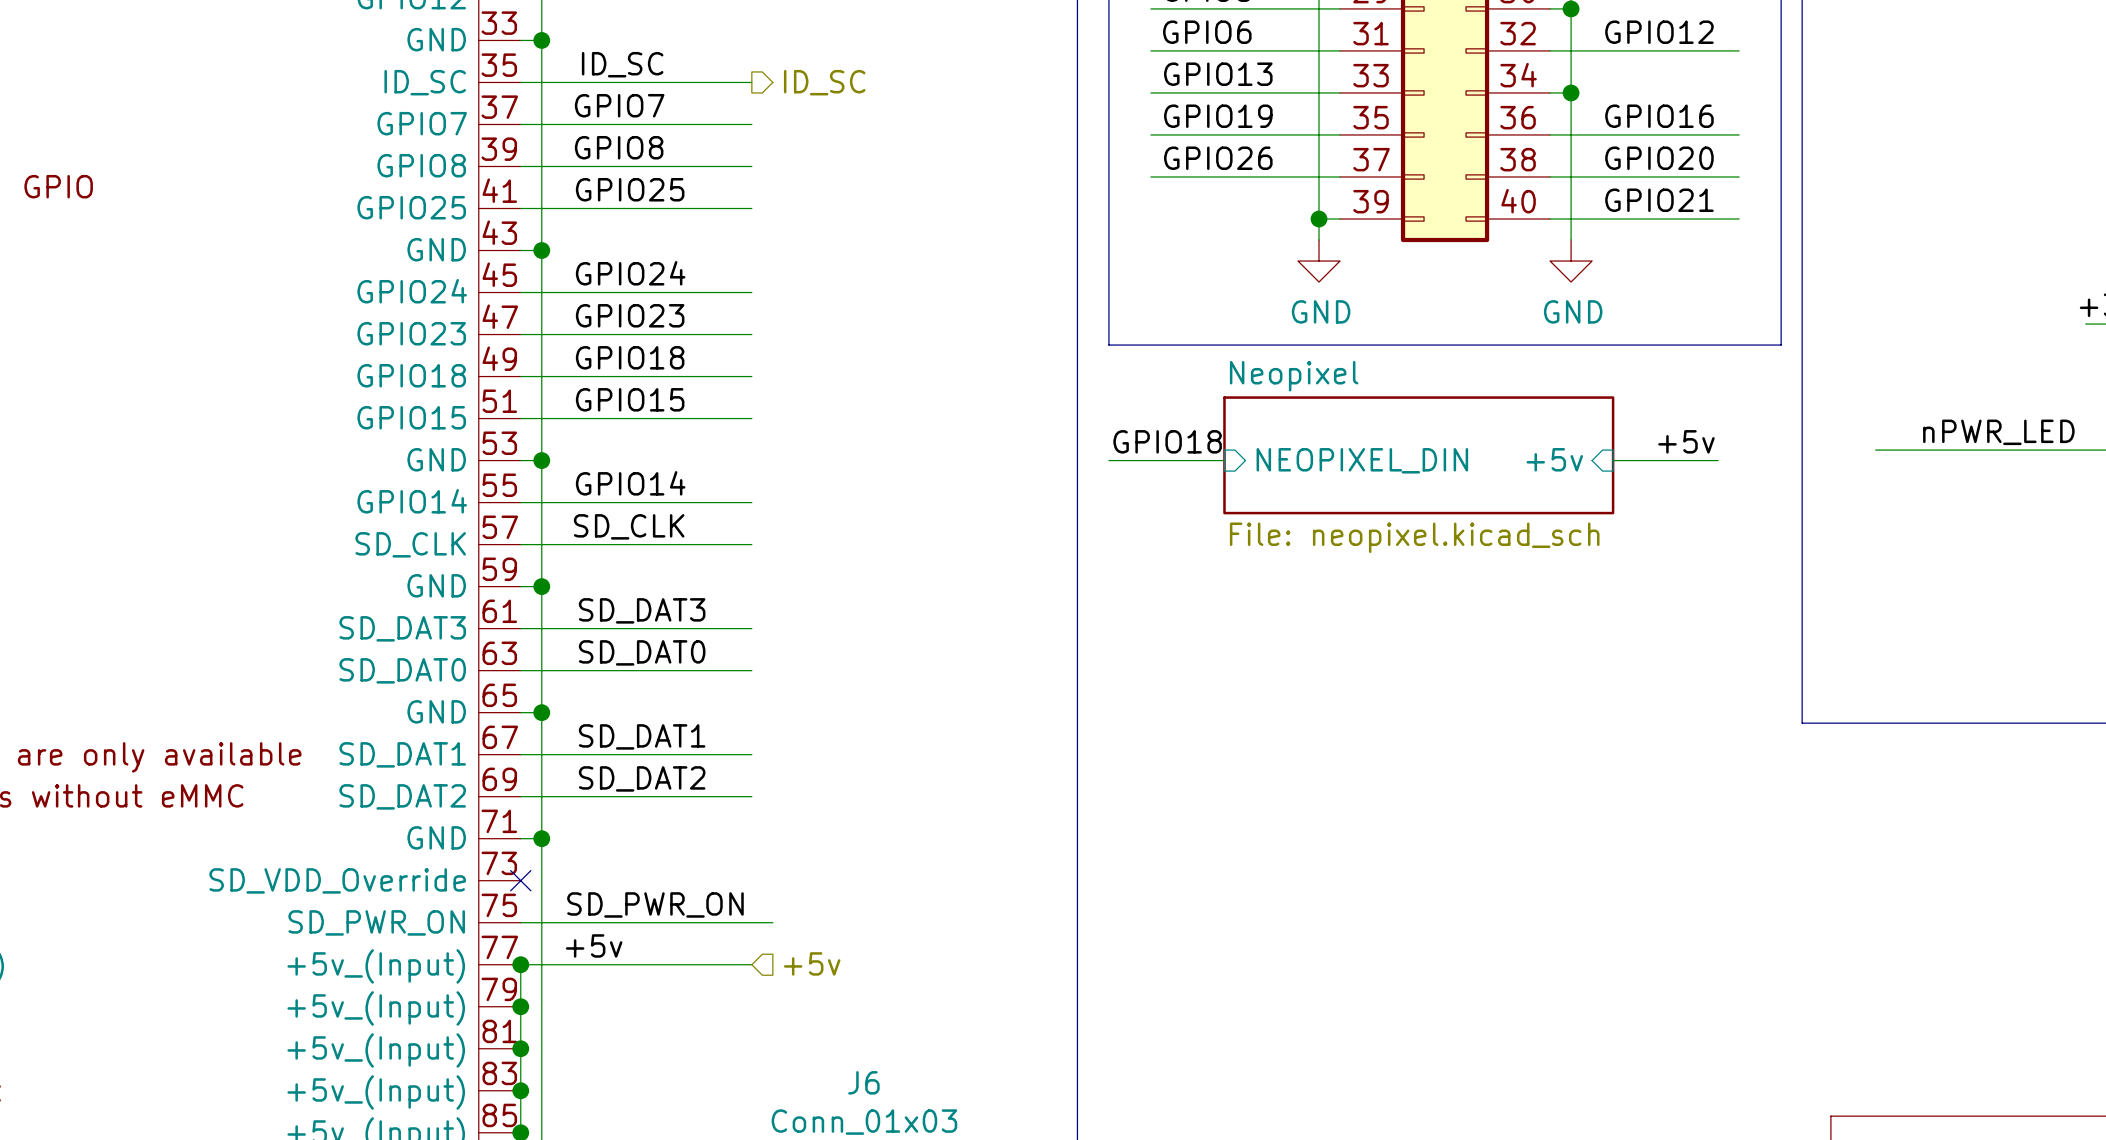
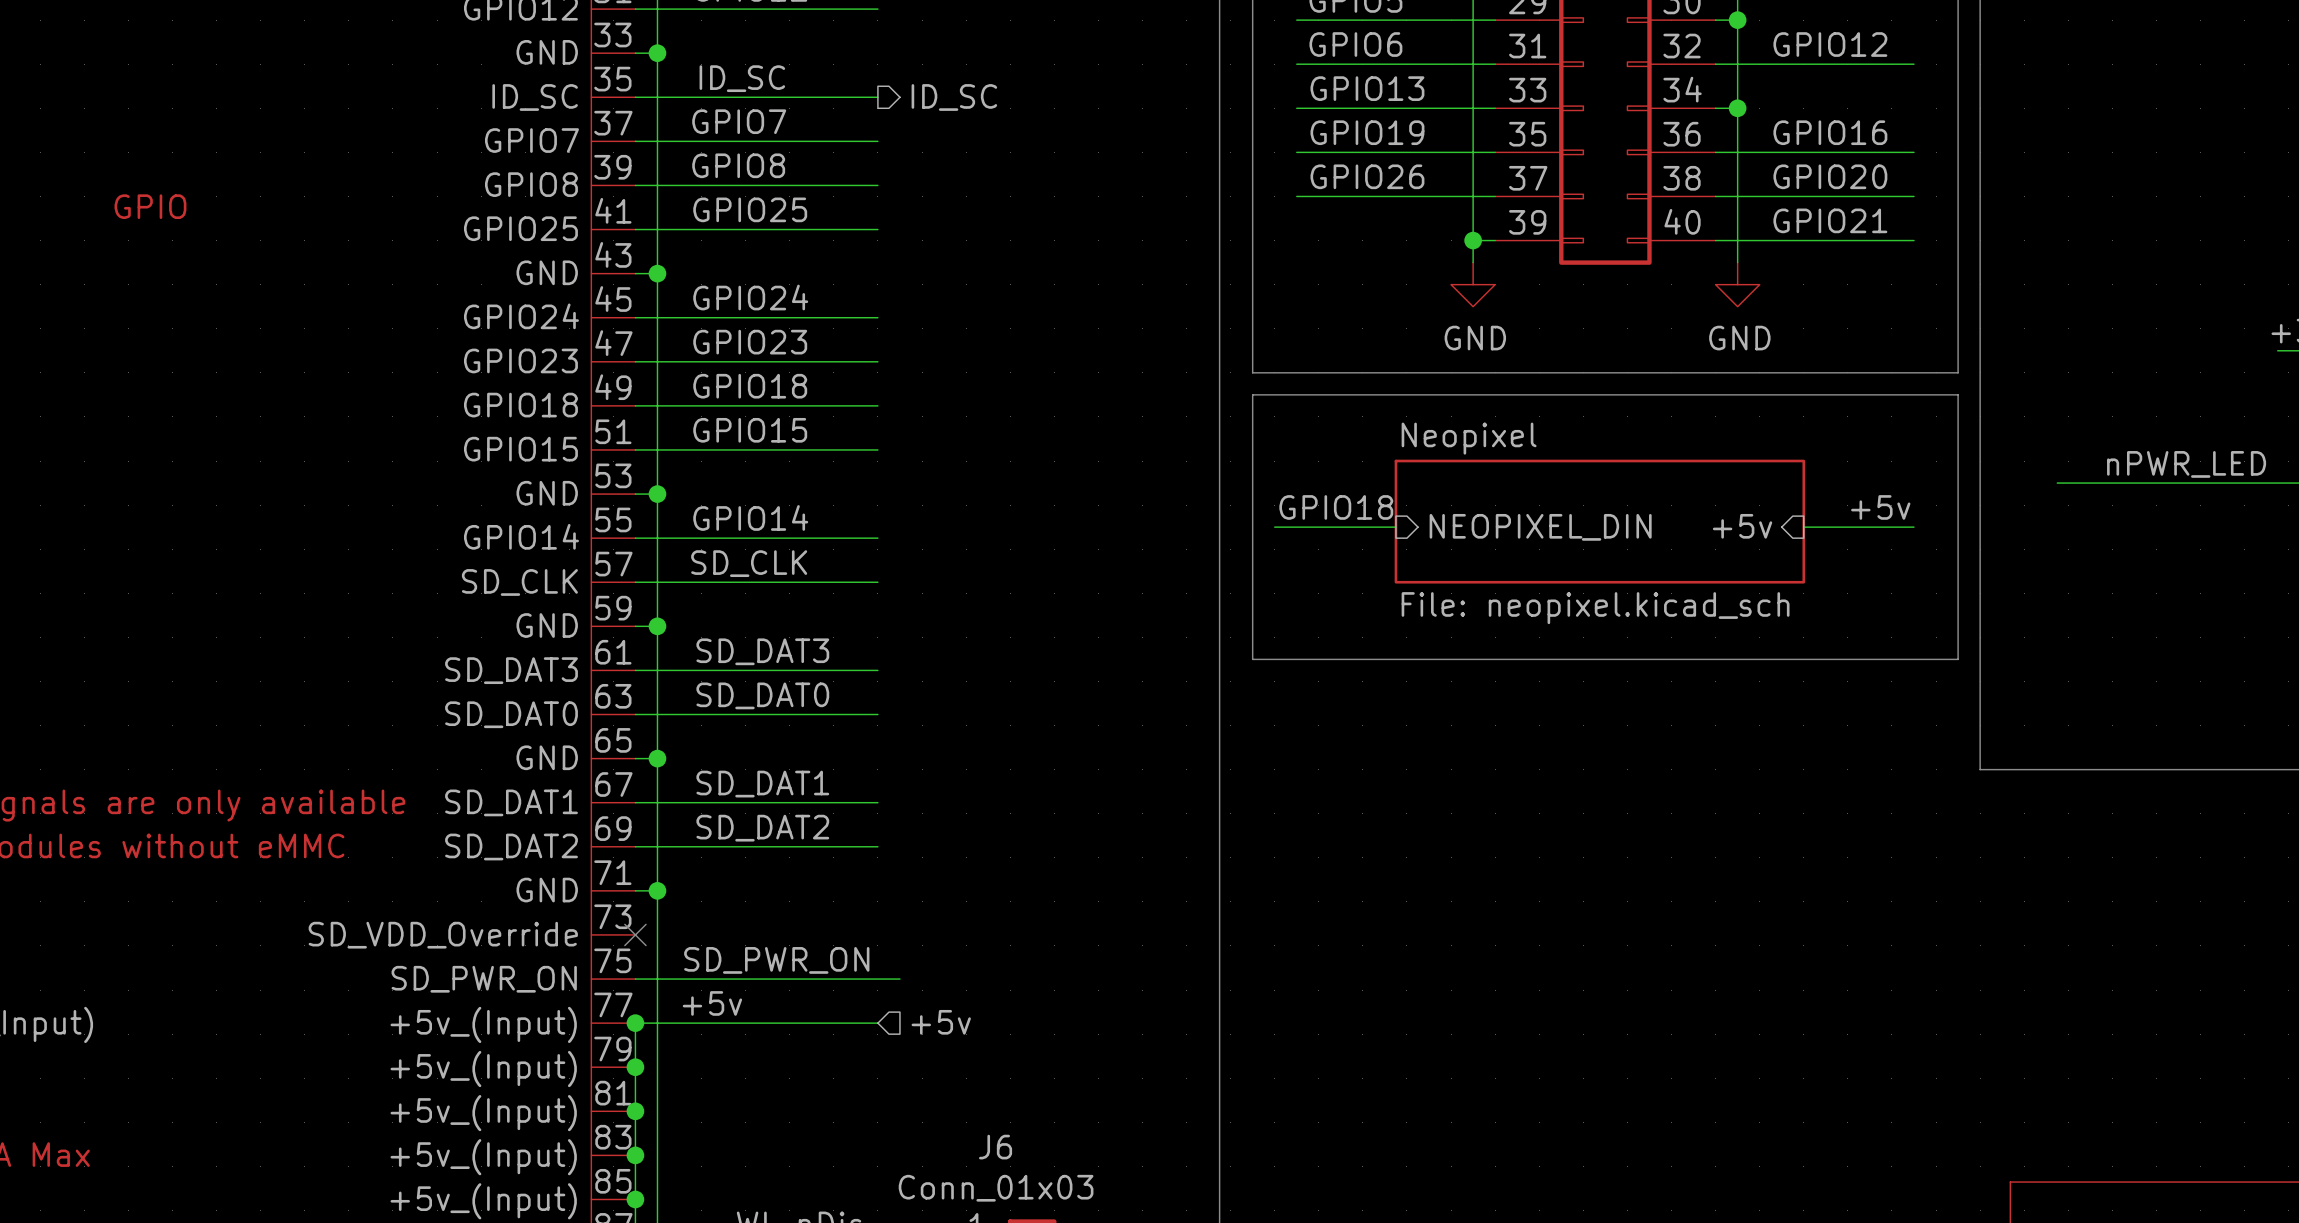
line: none -> (1252, 394) (1958, 394) (1958, 659) (1252, 659) (1252, 394)
label position: GPIO18 (1167, 441) -> GPIO18 (1336, 507)
label position: +5v (1686, 441) -> +5v (1880, 507)
sheet Neopixel position: (1418, 455) -> (1599, 521)
sheet pin position: +5v (1554, 459) -> +5v (1742, 526)
wire: (1108, 460) (1224, 460) -> (1274, 527) (1395, 527)
sheet pin position: NEOPIXEL_DIN (1362, 460) -> NEOPIXEL_DIN (1540, 527)
wire: (1613, 460) (1718, 460) -> (1803, 527) (1914, 527)

